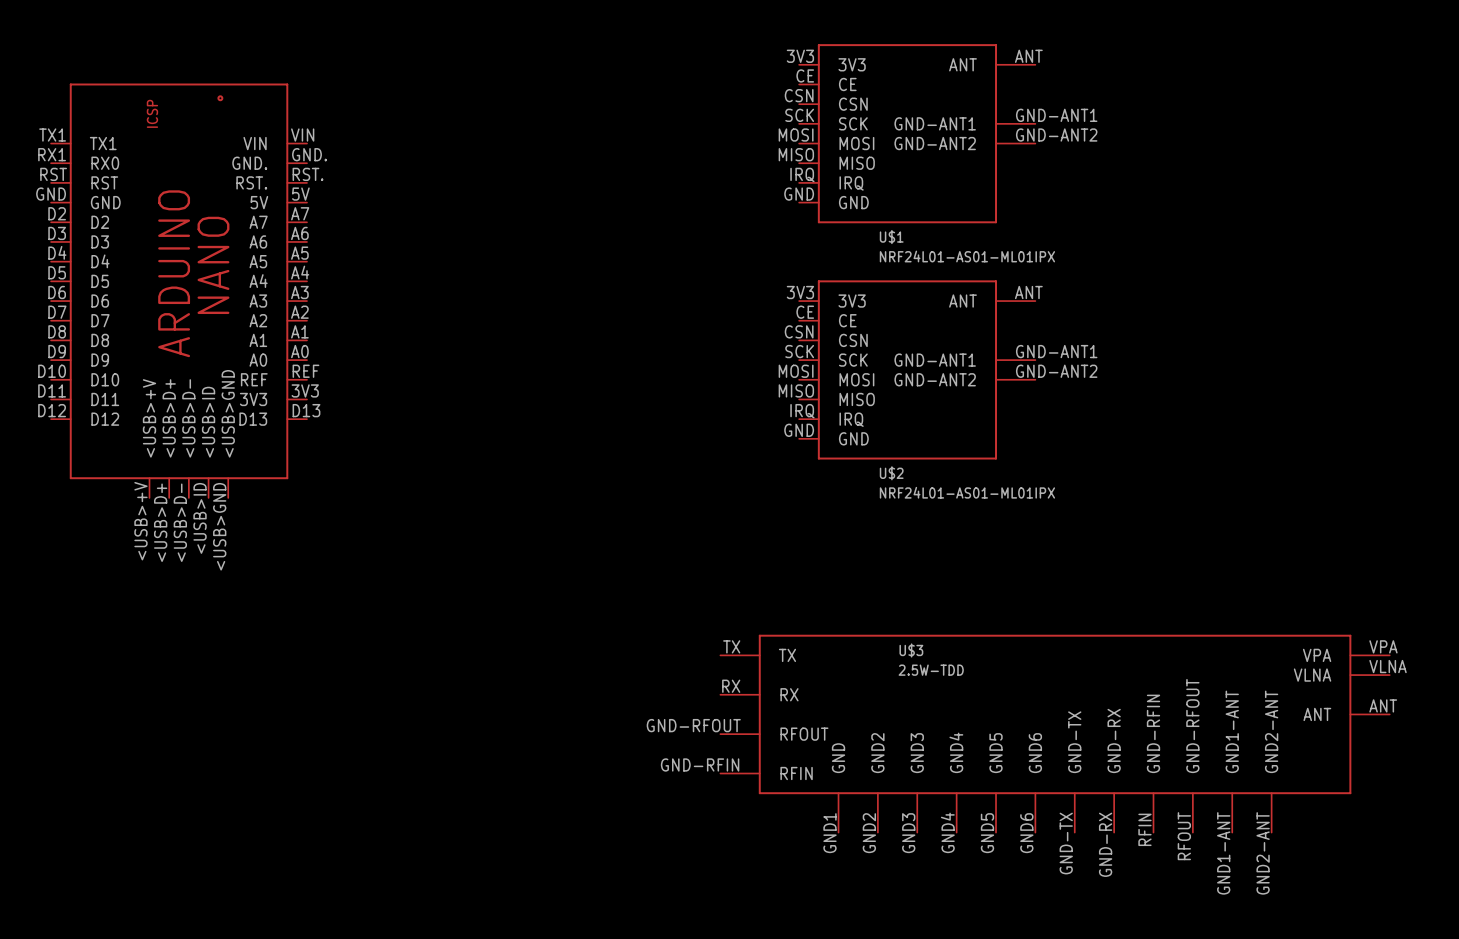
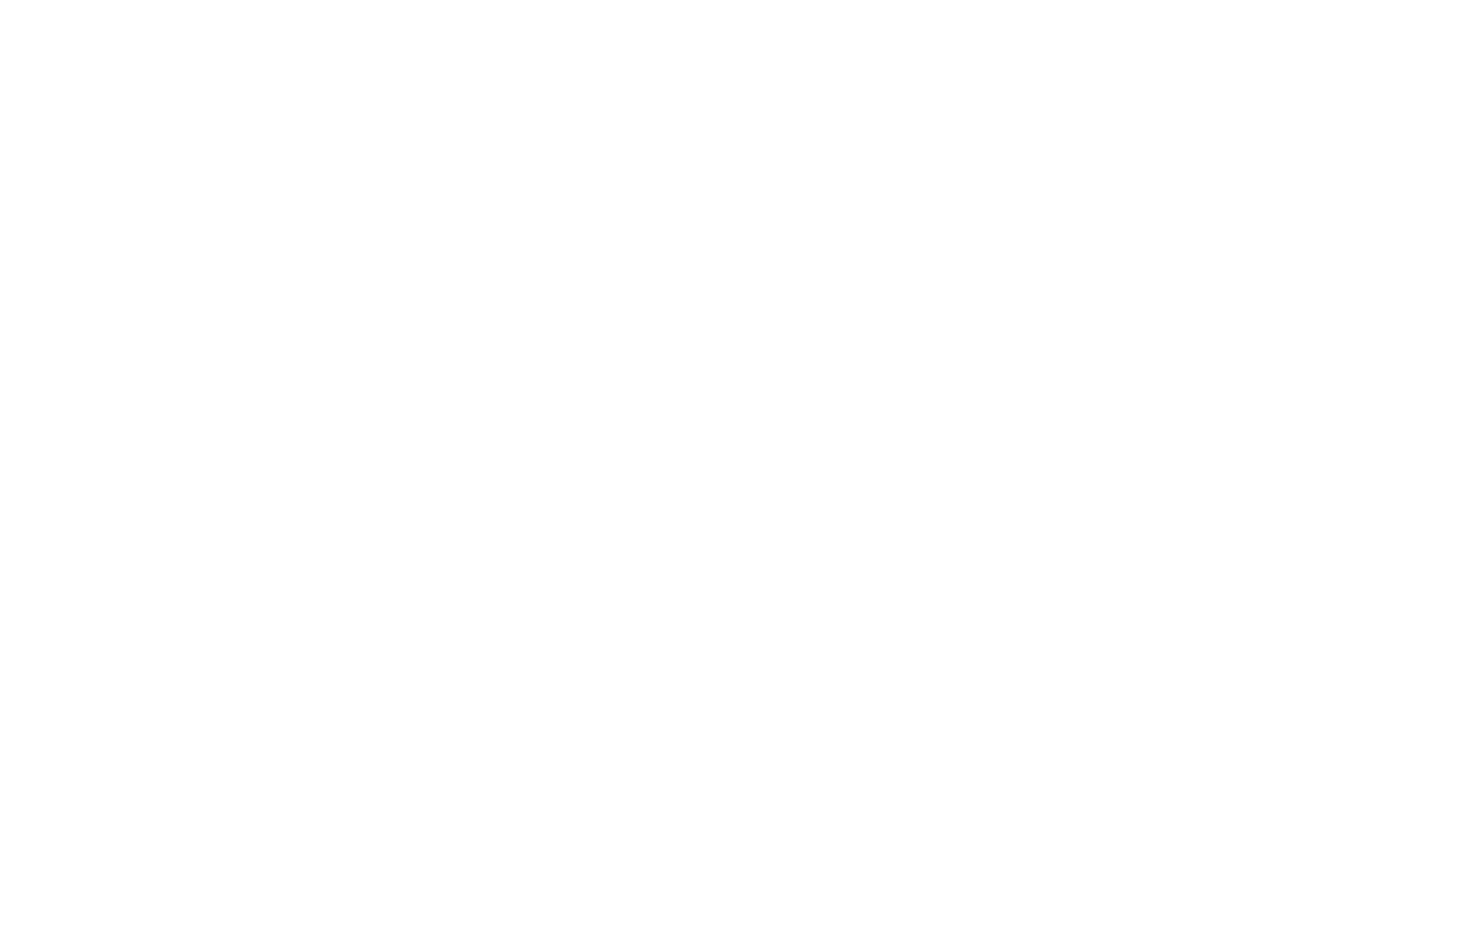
U$1: NRF24L01-AS01-ML01IPX (917, 133) -> none
part: (179, 290) -> none
U$2: NRF24L01-AS01-ML01IPX (917, 369) -> none
U$3: 2.5W-TDD (1055, 733) -> none

